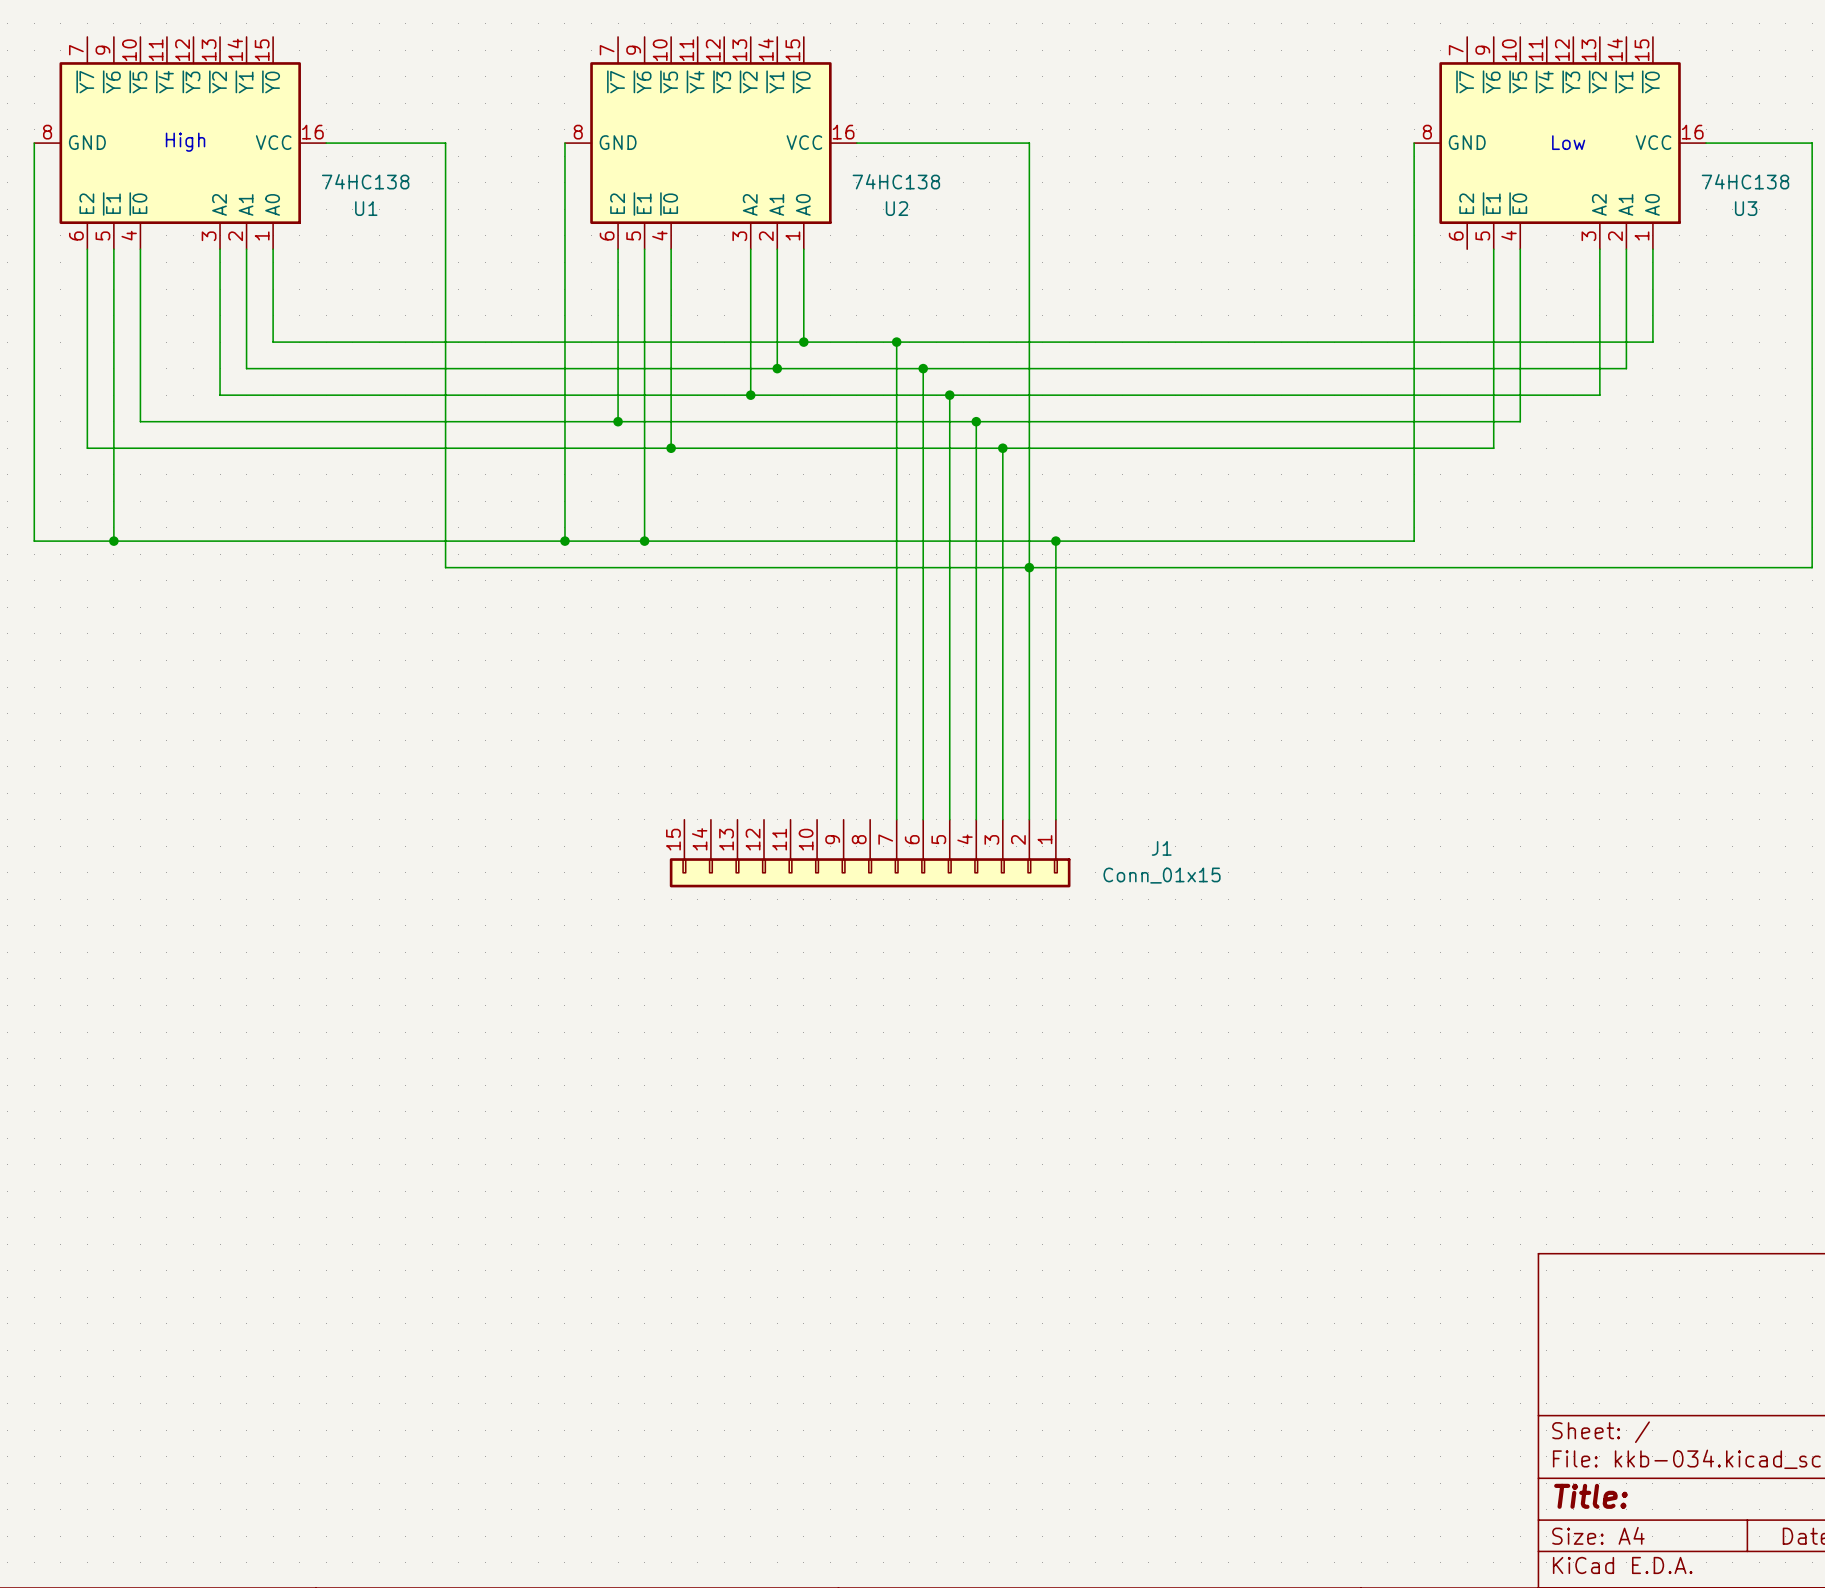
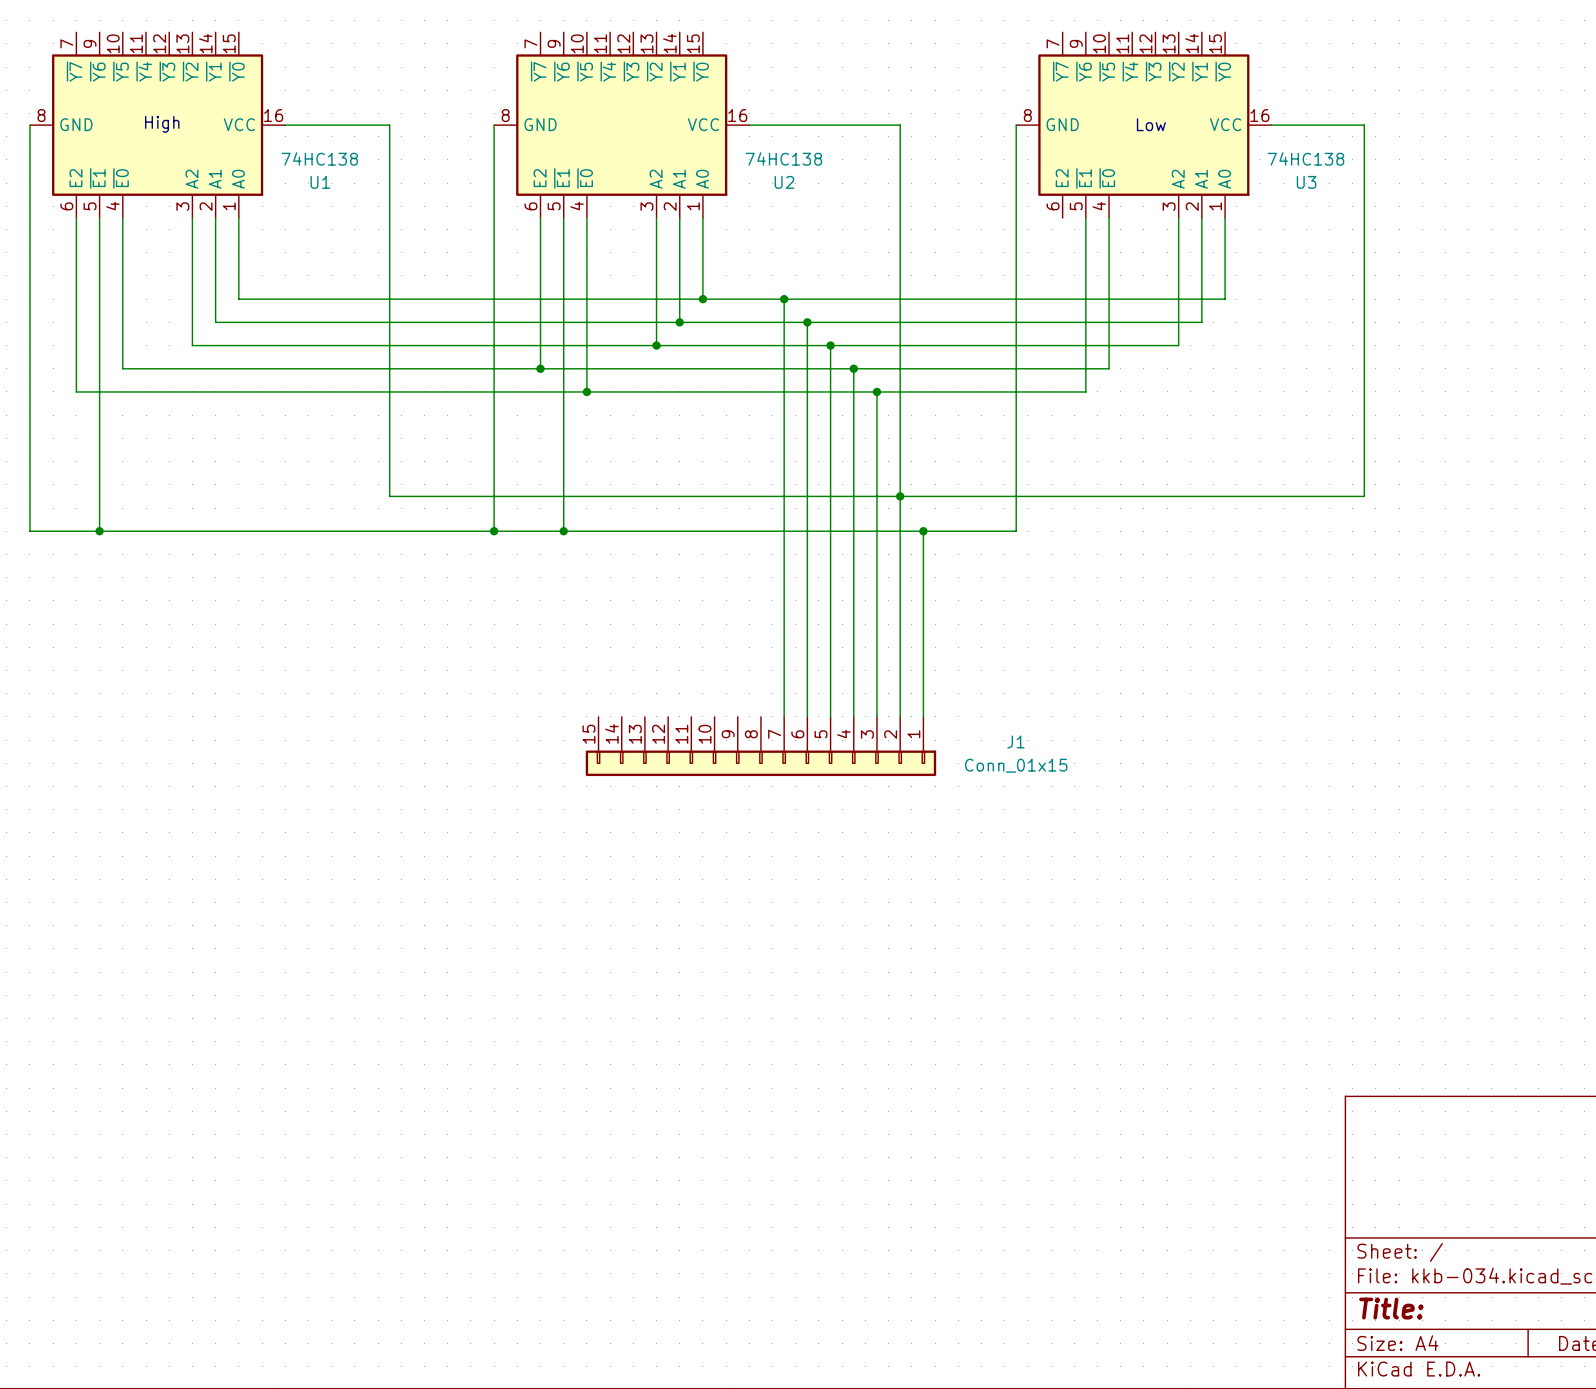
text position: Low (1568, 142) -> Low (1151, 124)
wire: (1414, 143) (1414, 541) (34, 541) -> (1016, 125) (1016, 531) (29, 531) (29, 473)
U3 position: (1560, 143) -> (1143, 125)
wire: (1706, 143) (1812, 143) (1812, 567) (1560, 567) -> (1271, 125) (1364, 125) (1364, 496)
wire: (1493, 249) (1493, 448) (1241, 448) -> (1085, 217) (1085, 391)
wire: (1520, 249) (1520, 421) (1268, 421) -> (1109, 217) (1109, 368)
wire: (1599, 249) (1599, 395) (1347, 395) -> (1178, 217) (1178, 345)
wire: (1626, 249) (1626, 368) (1374, 368) -> (1201, 217) (1201, 322)
wire: (1652, 249) (1652, 342) (1400, 342) -> (1225, 217) (1225, 299)
wire: none -> (99, 473) (99, 531)
junction: (113, 541) -> none
wire: none -> (494, 473) (494, 531)
junction: (564, 541) -> none
wire: none -> (563, 473) (563, 531)
junction: (644, 541) -> none
wire: (1055, 541) (1055, 607) -> none
junction: (1055, 541) -> none
junction: none -> (99, 531)
junction: none -> (494, 531)
junction: none -> (563, 531)
junction: none -> (923, 531)

